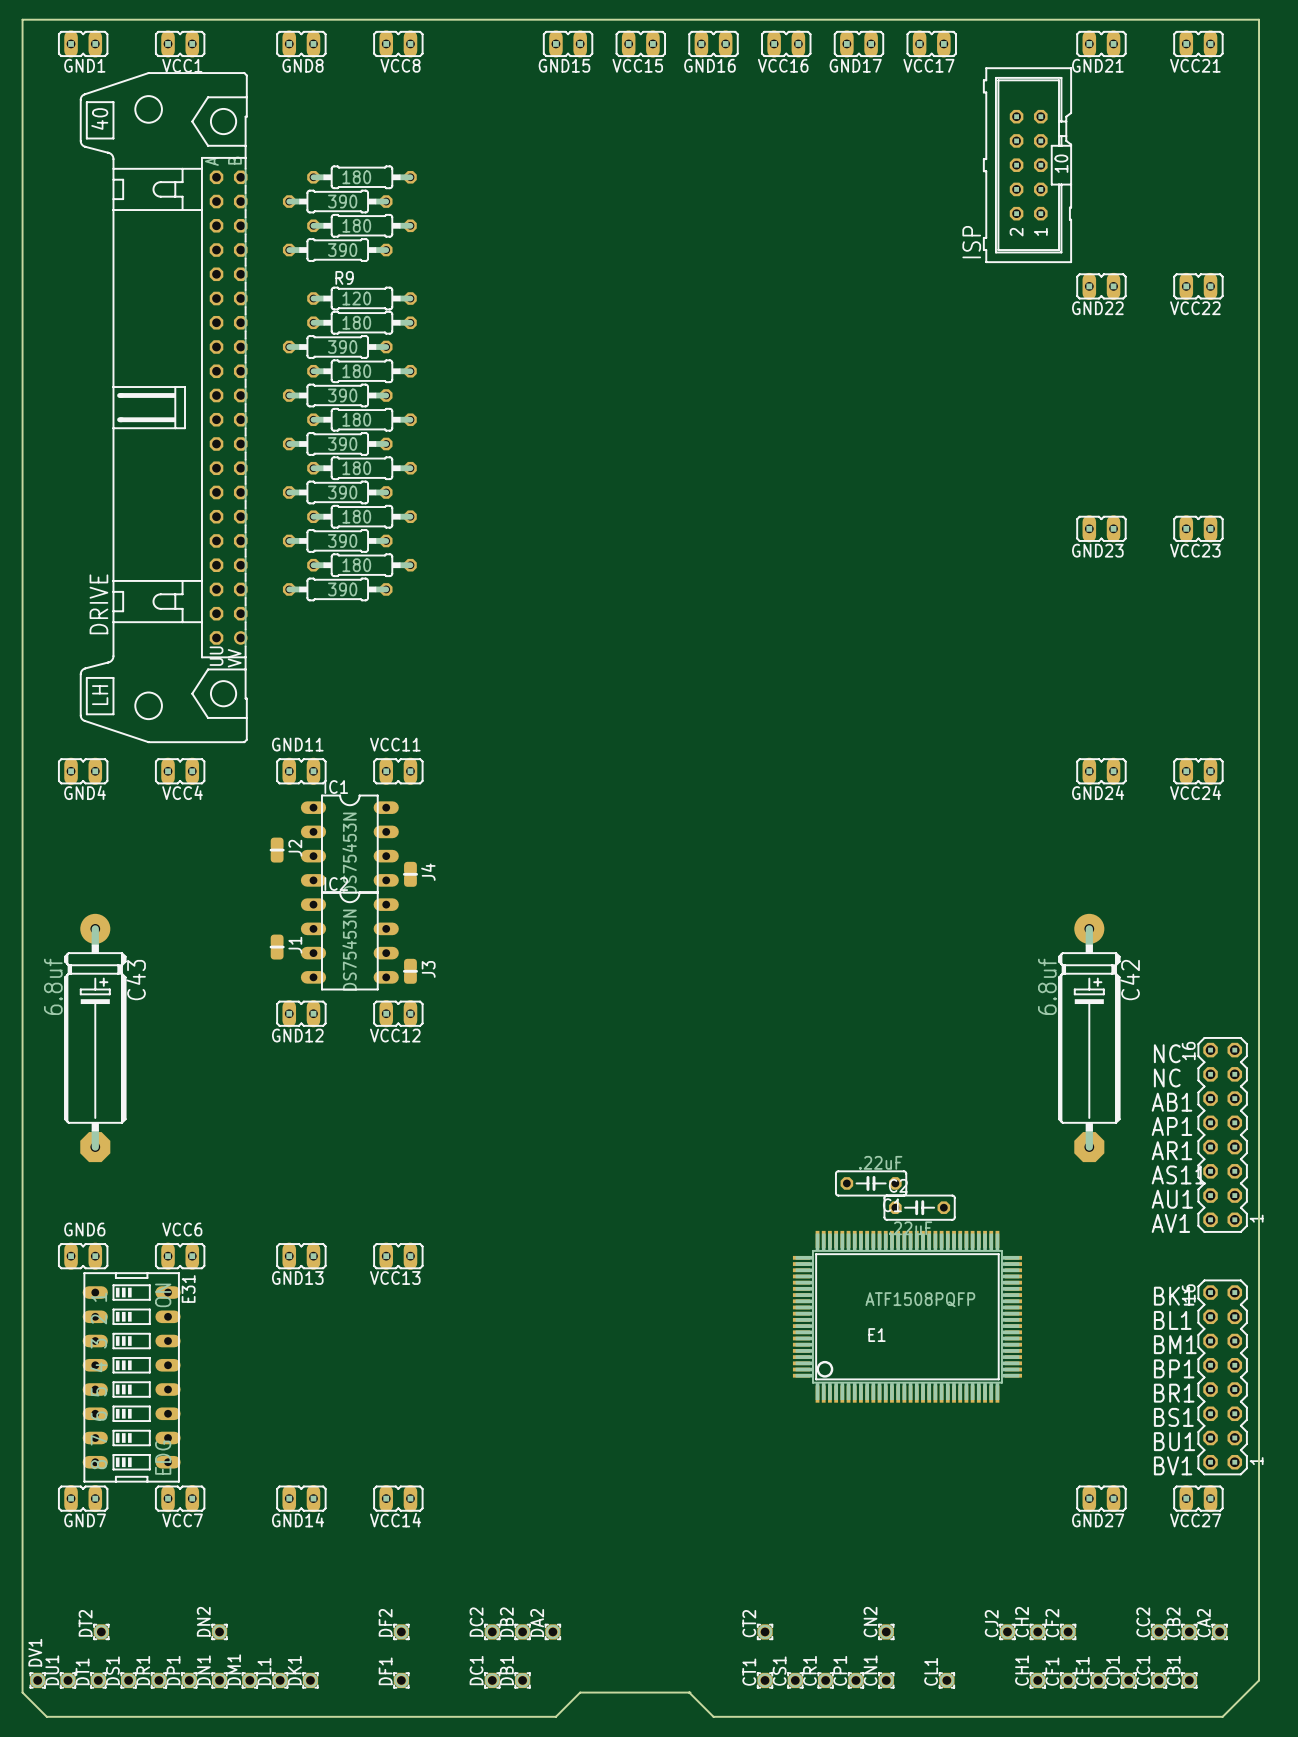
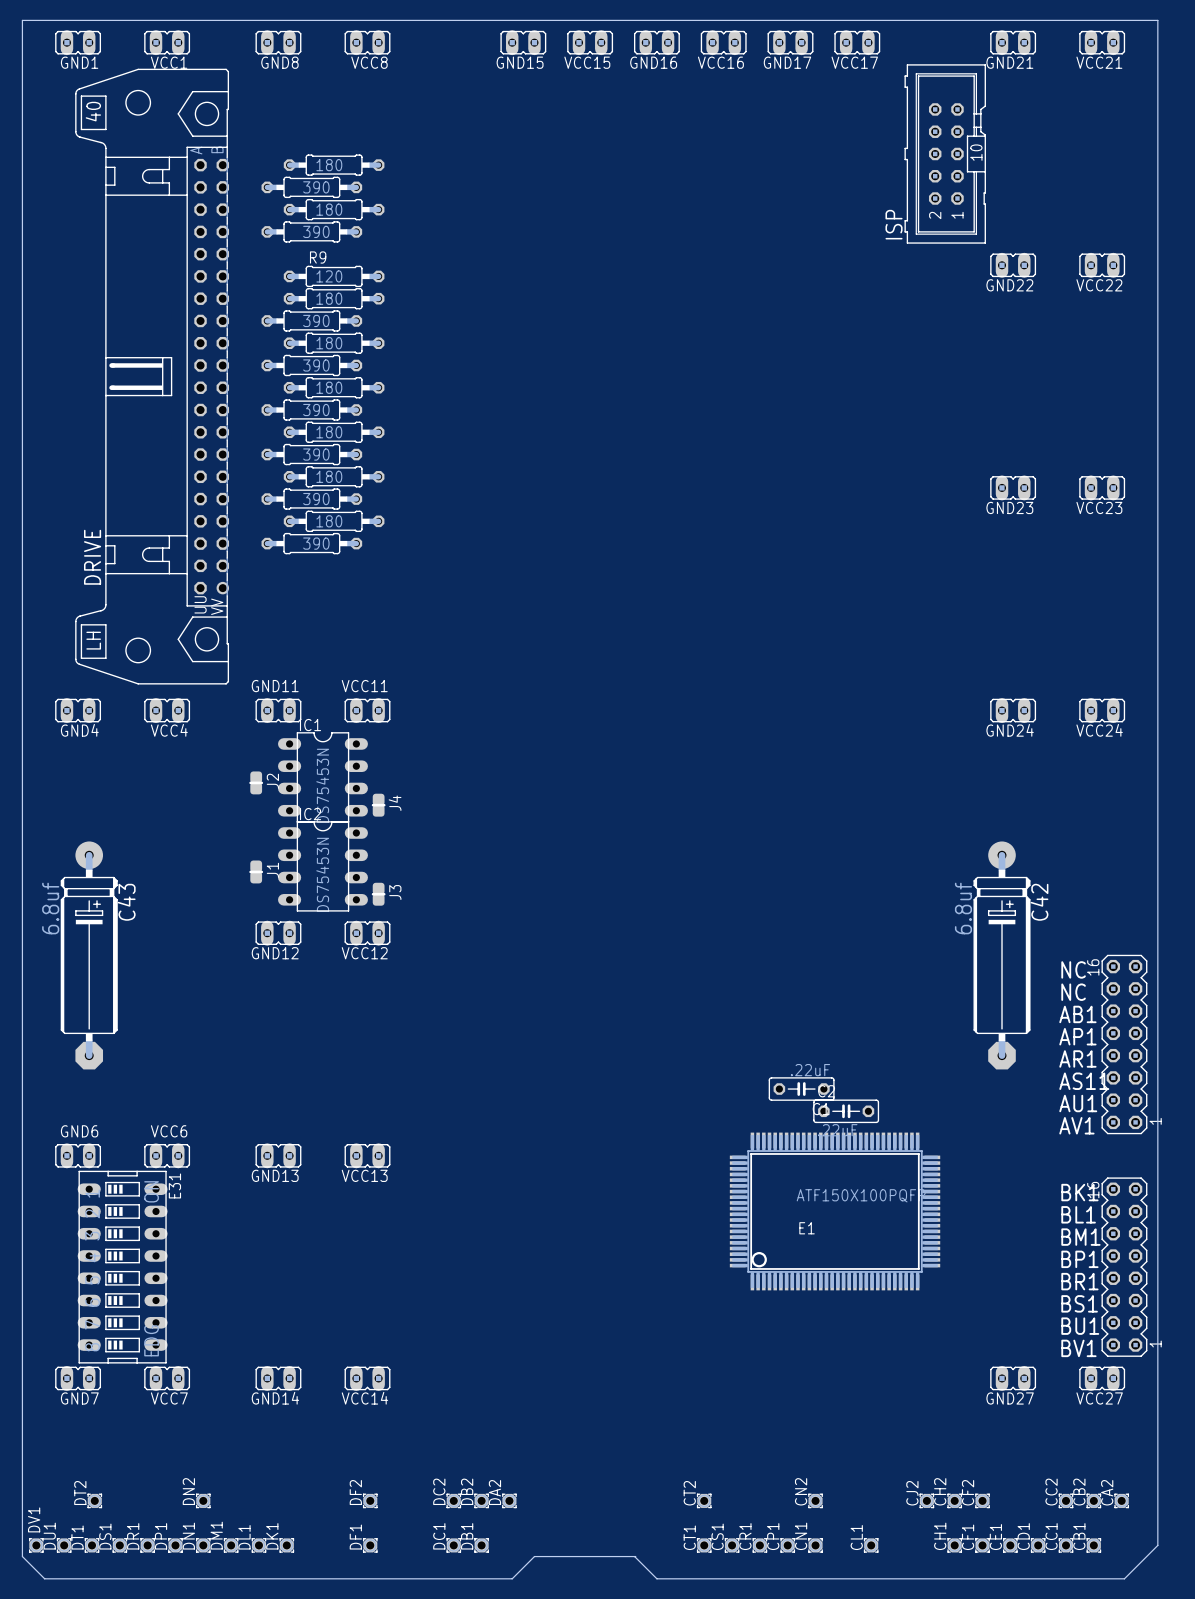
E1 value: ATF1508PQFP (920, 1299) -> ATF150X100PQFP (861, 1195)

